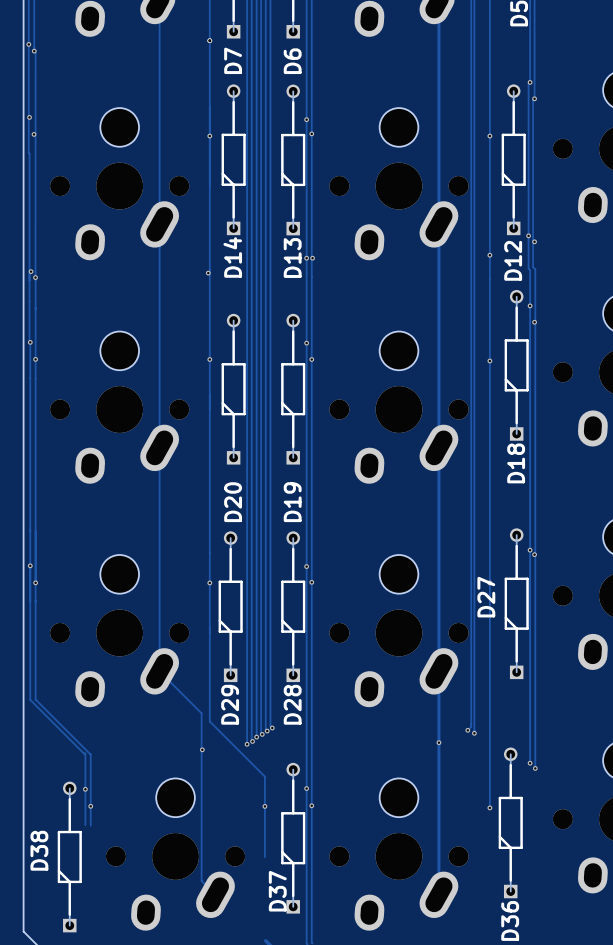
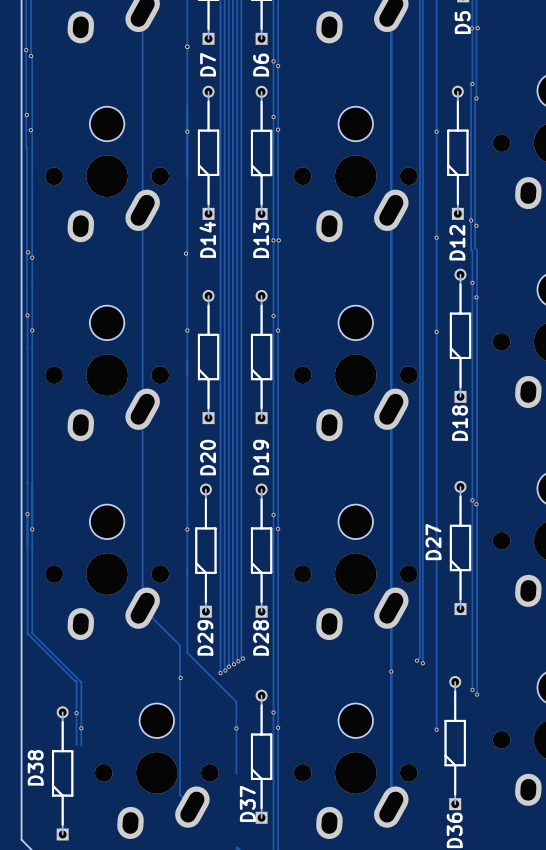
via: none -> (477, 28)
via: none -> (472, 28)
via: none -> (273, 61)
via: none -> (278, 66)

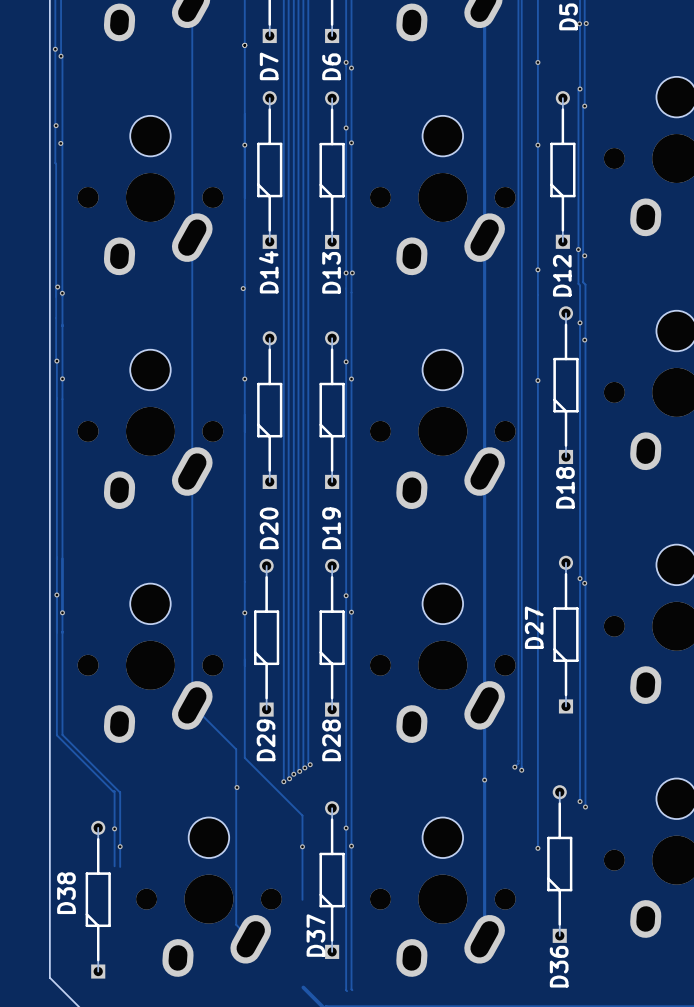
via: none -> (537, 62)

